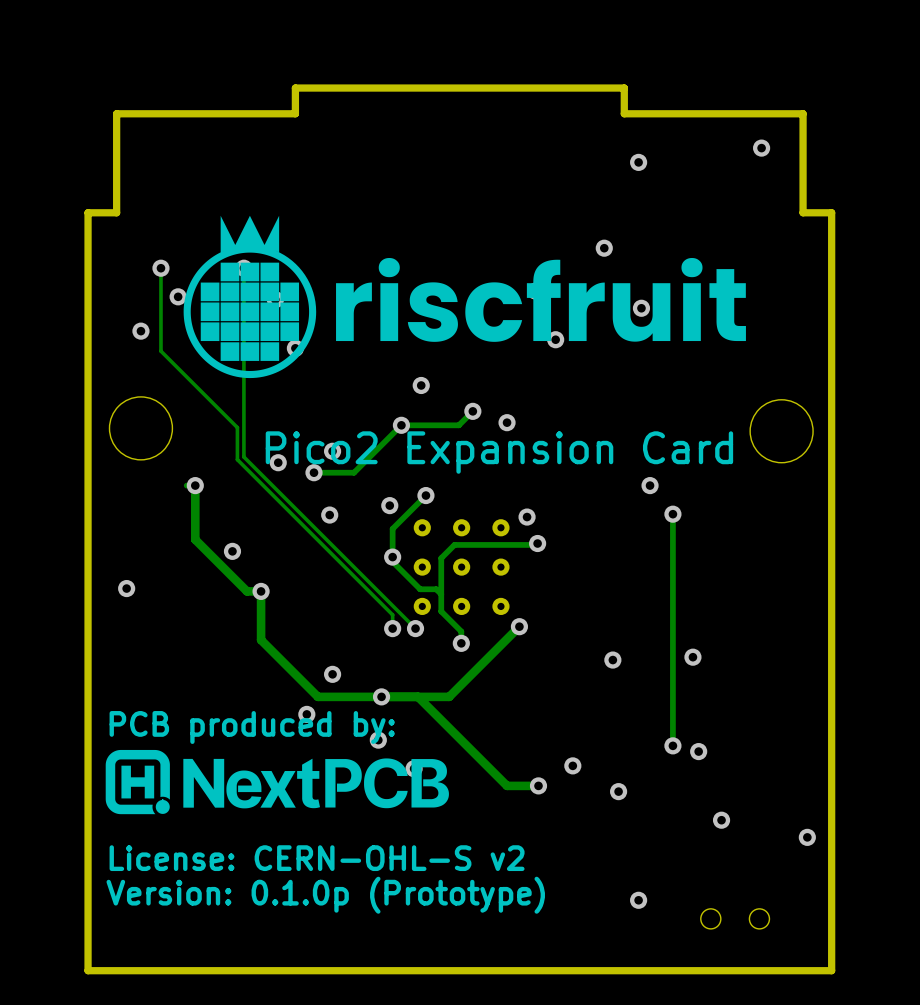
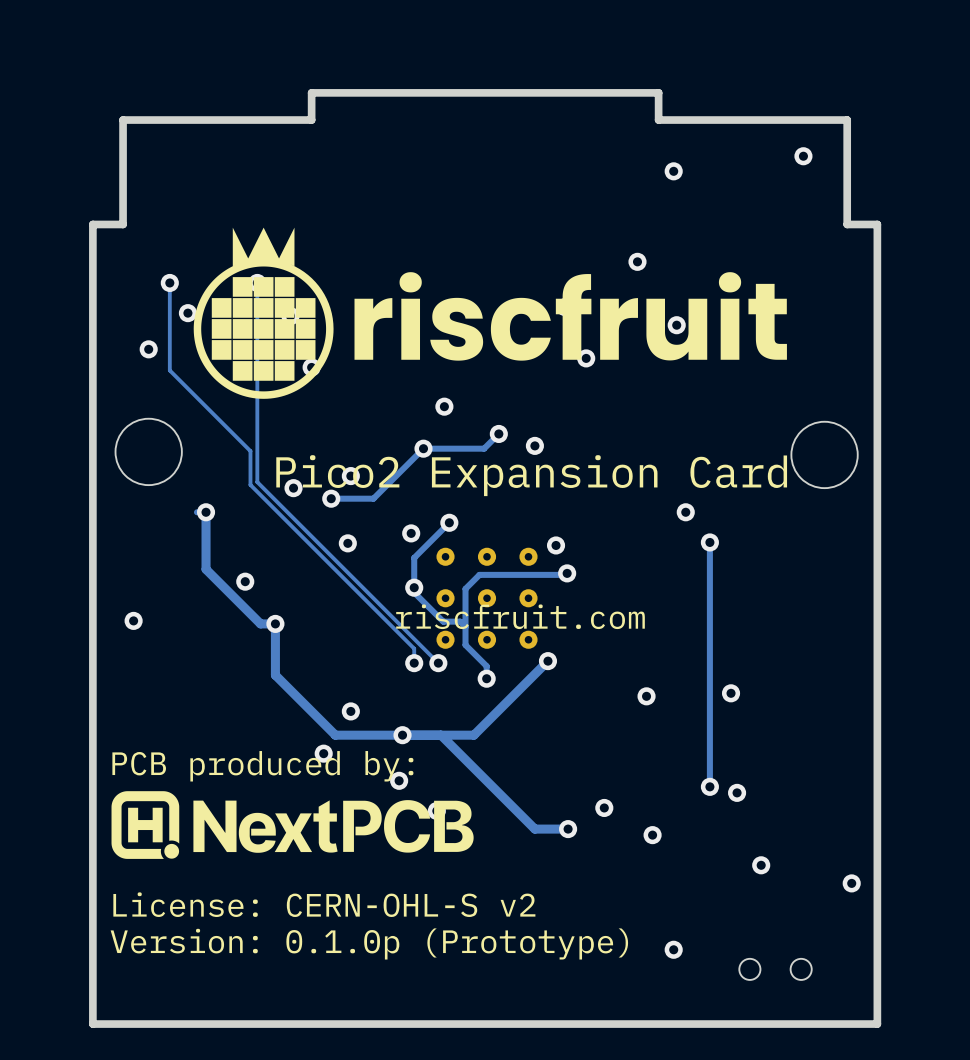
text: none -> riscfruit.com (520, 616)

